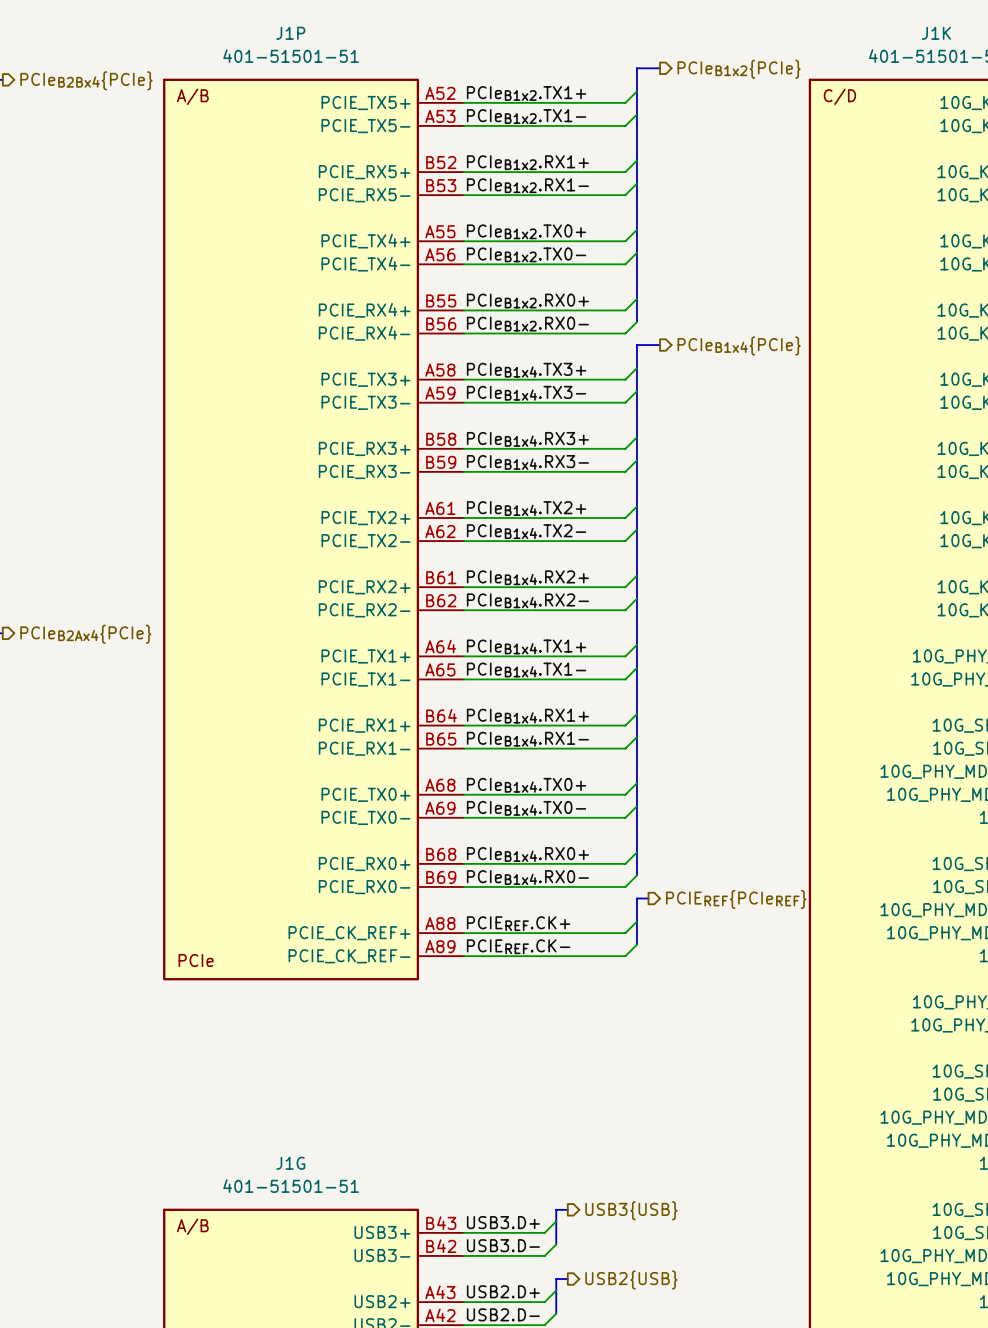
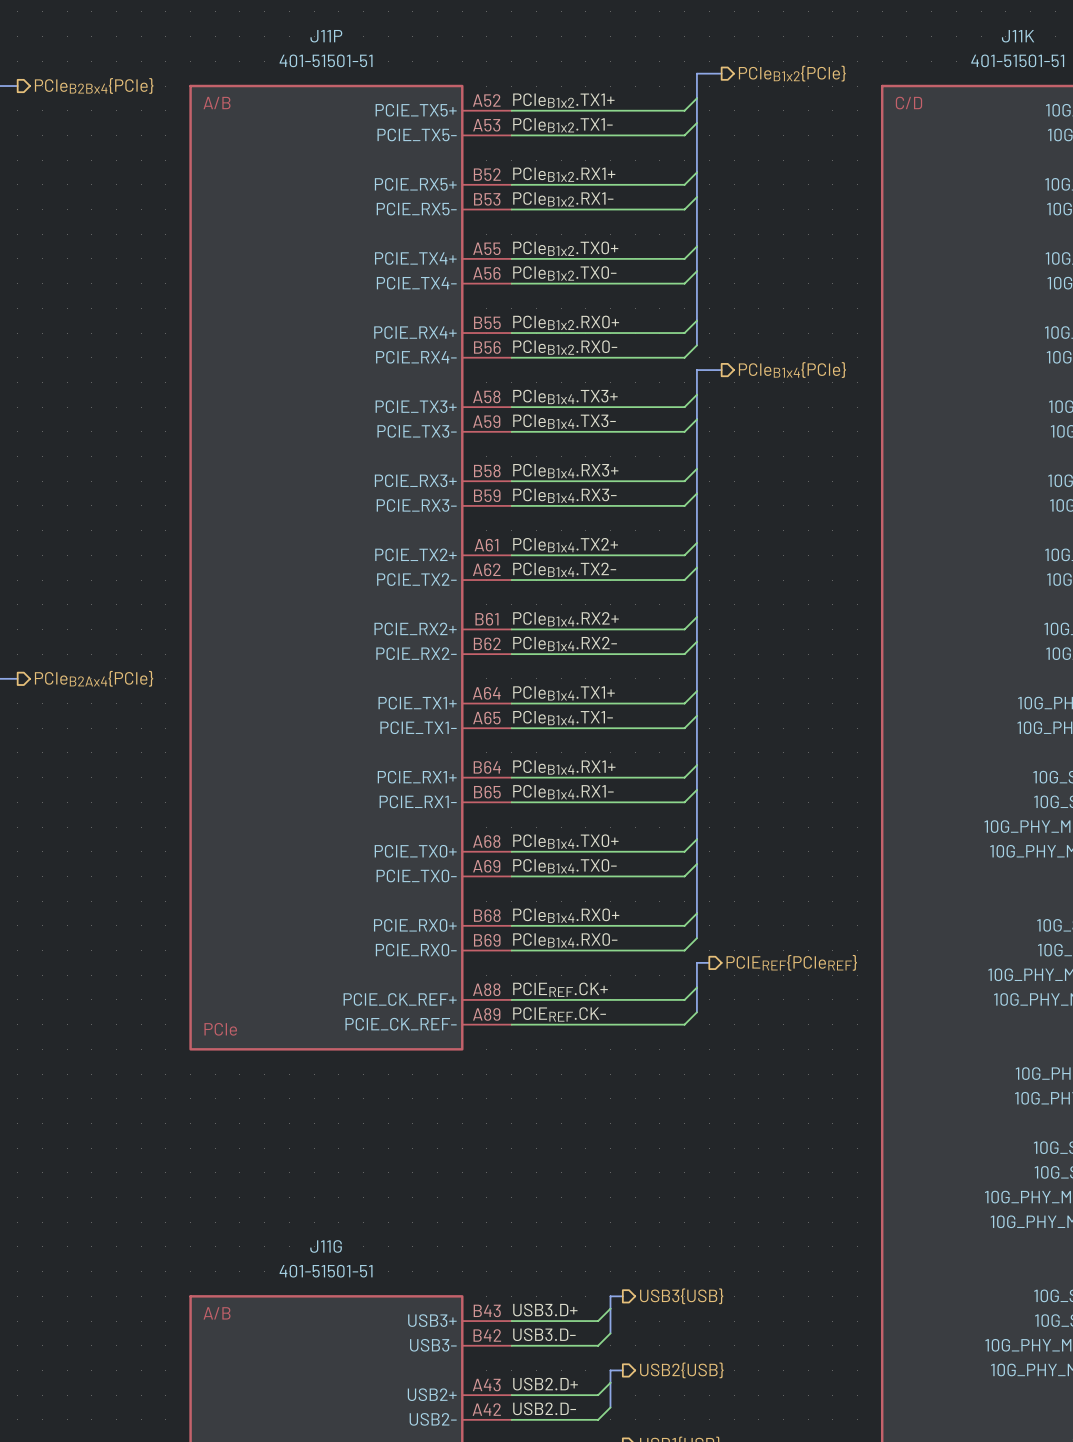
J1P name: J1P (290, 33) -> J11P (326, 36)
J1K name: J1K (936, 33) -> J11K (1018, 36)
J1G name: J1G (290, 1163) -> J11G (326, 1246)

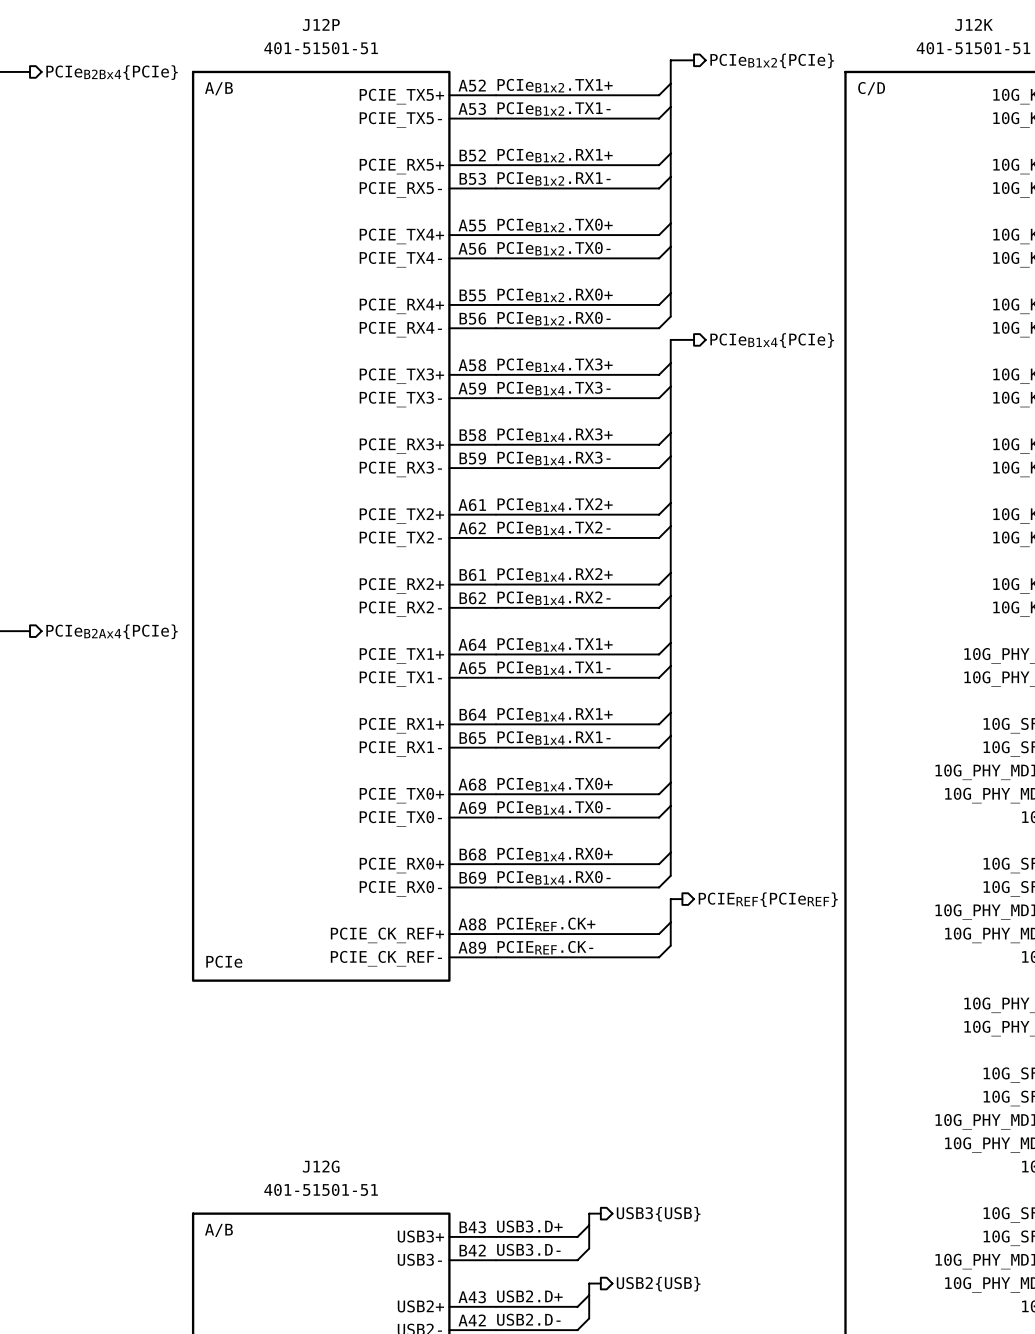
J11P name: J11P (326, 36) -> J12P (321, 24)
J11K name: J11K (1018, 36) -> J12K (974, 24)
J11G name: J11G (326, 1246) -> J12G (321, 1166)

